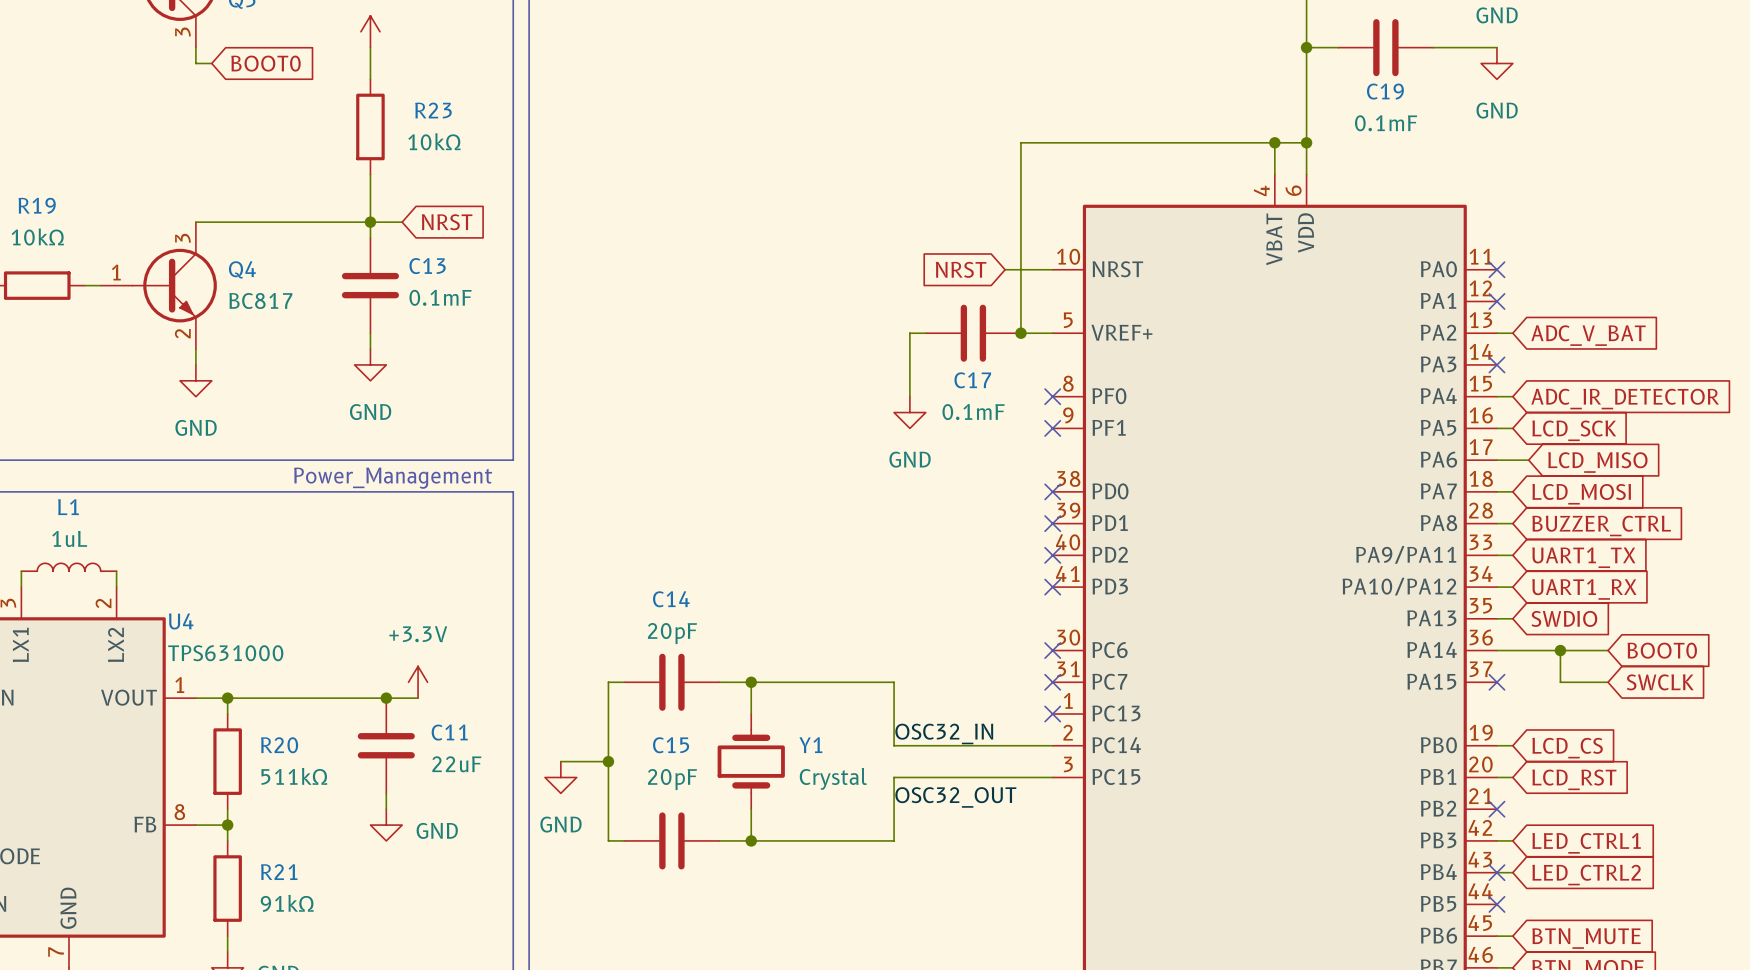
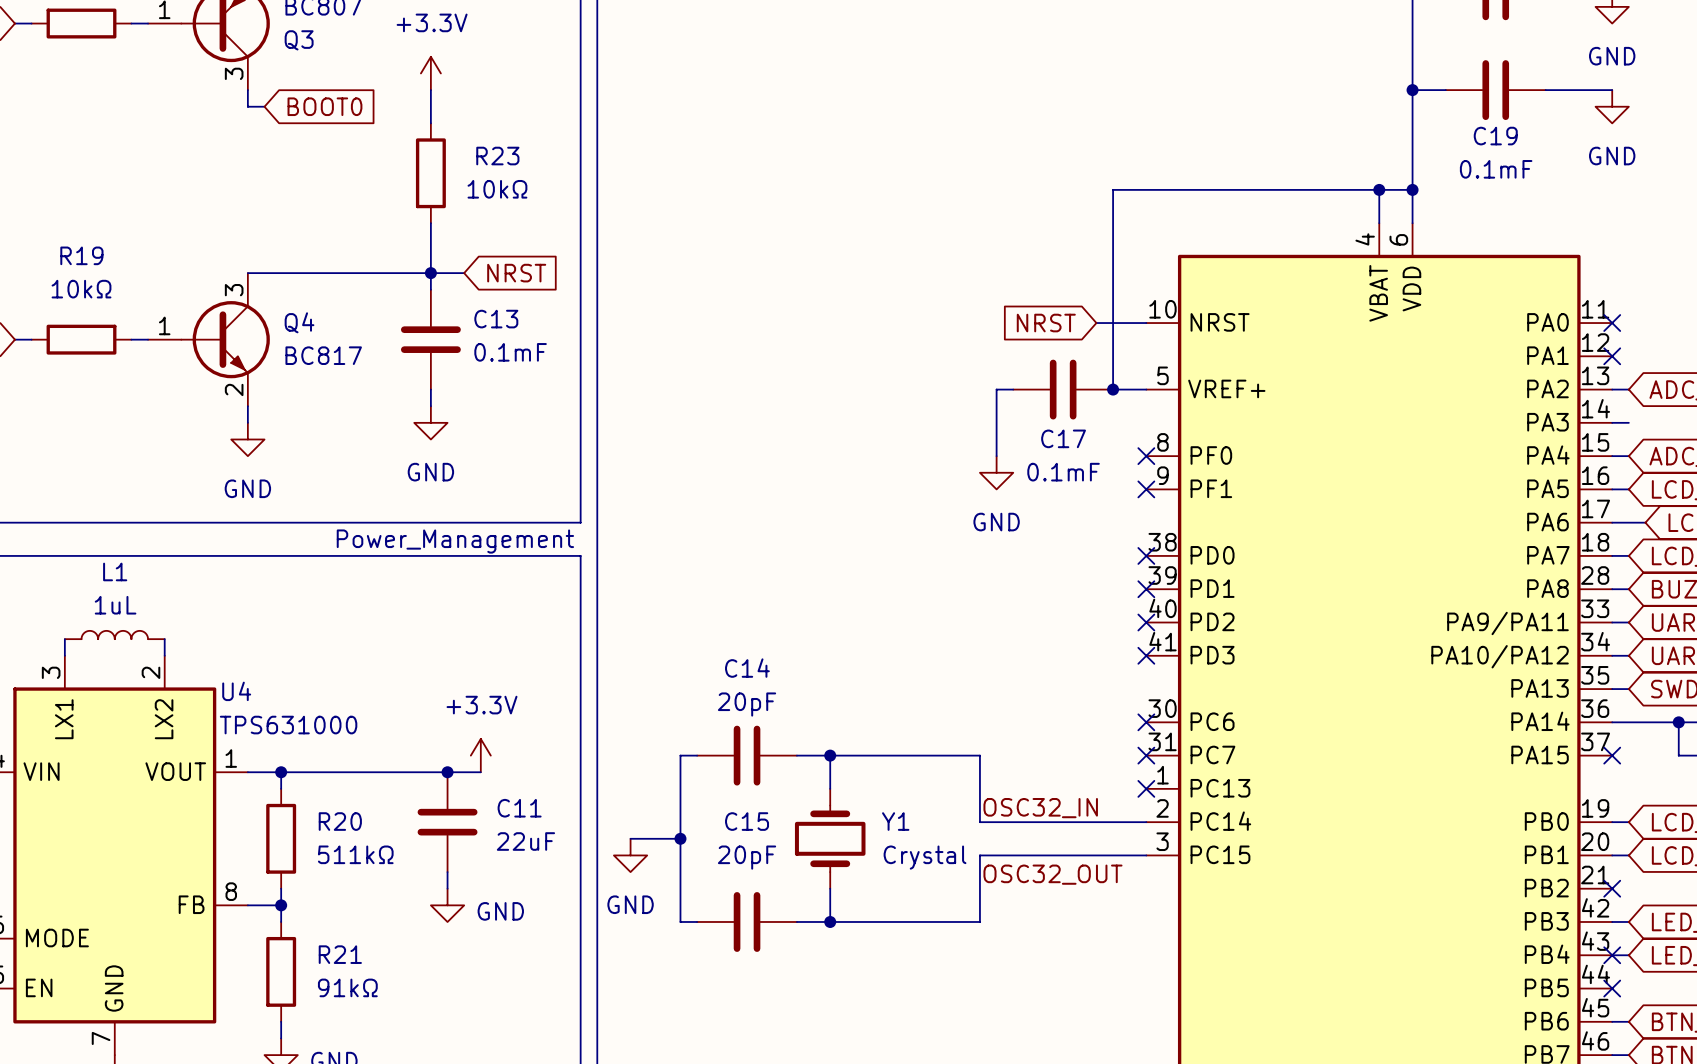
wire: none -> (1612, 422) (1628, 422)
no-connect mark: (1496, 364) -> none

